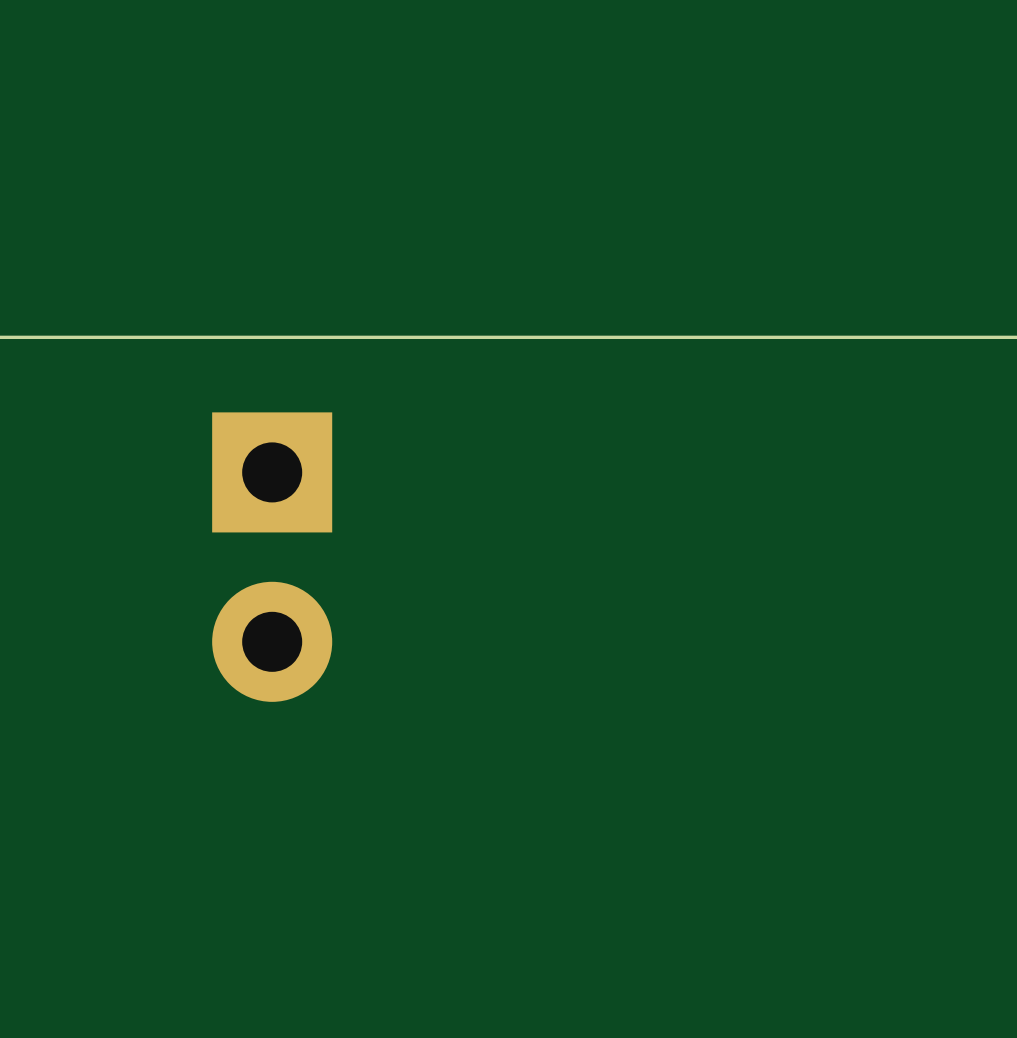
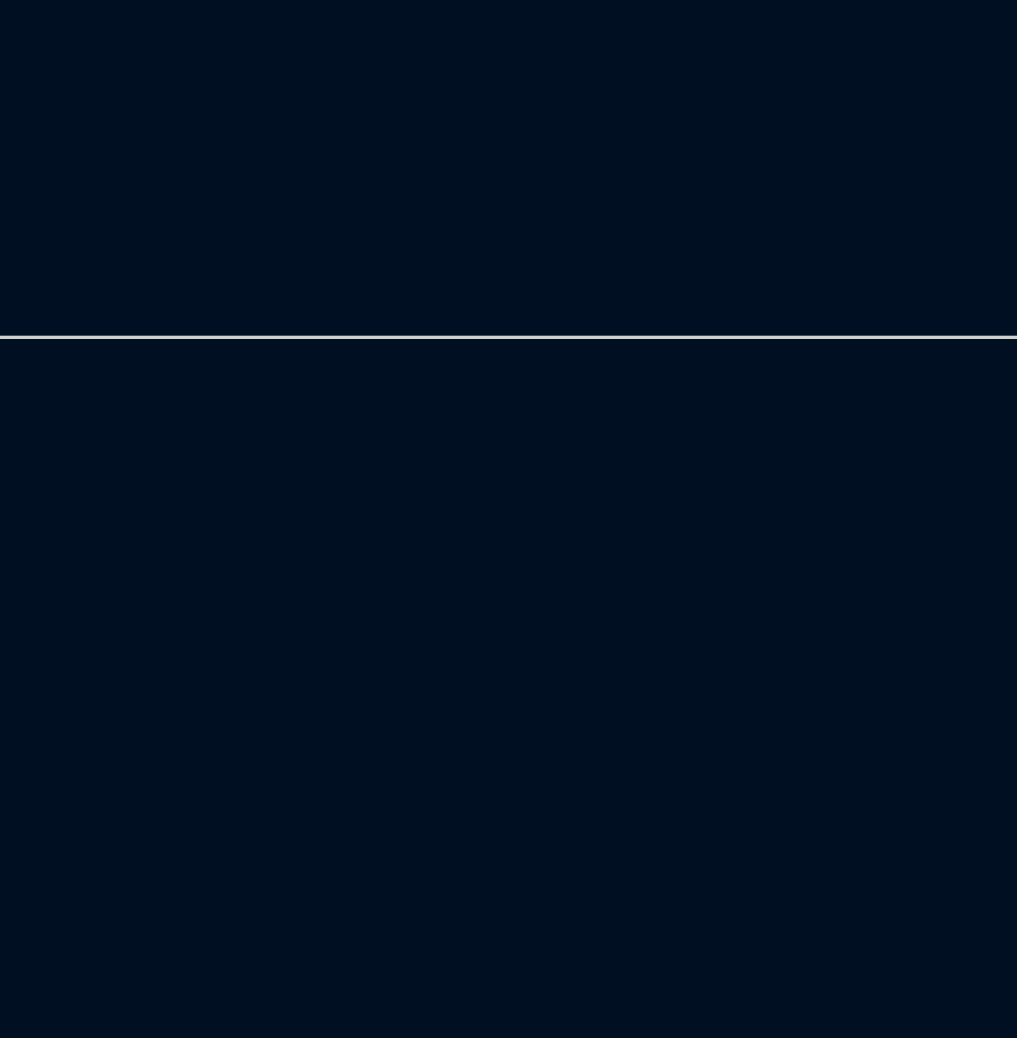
part: (272, 557) -> none

